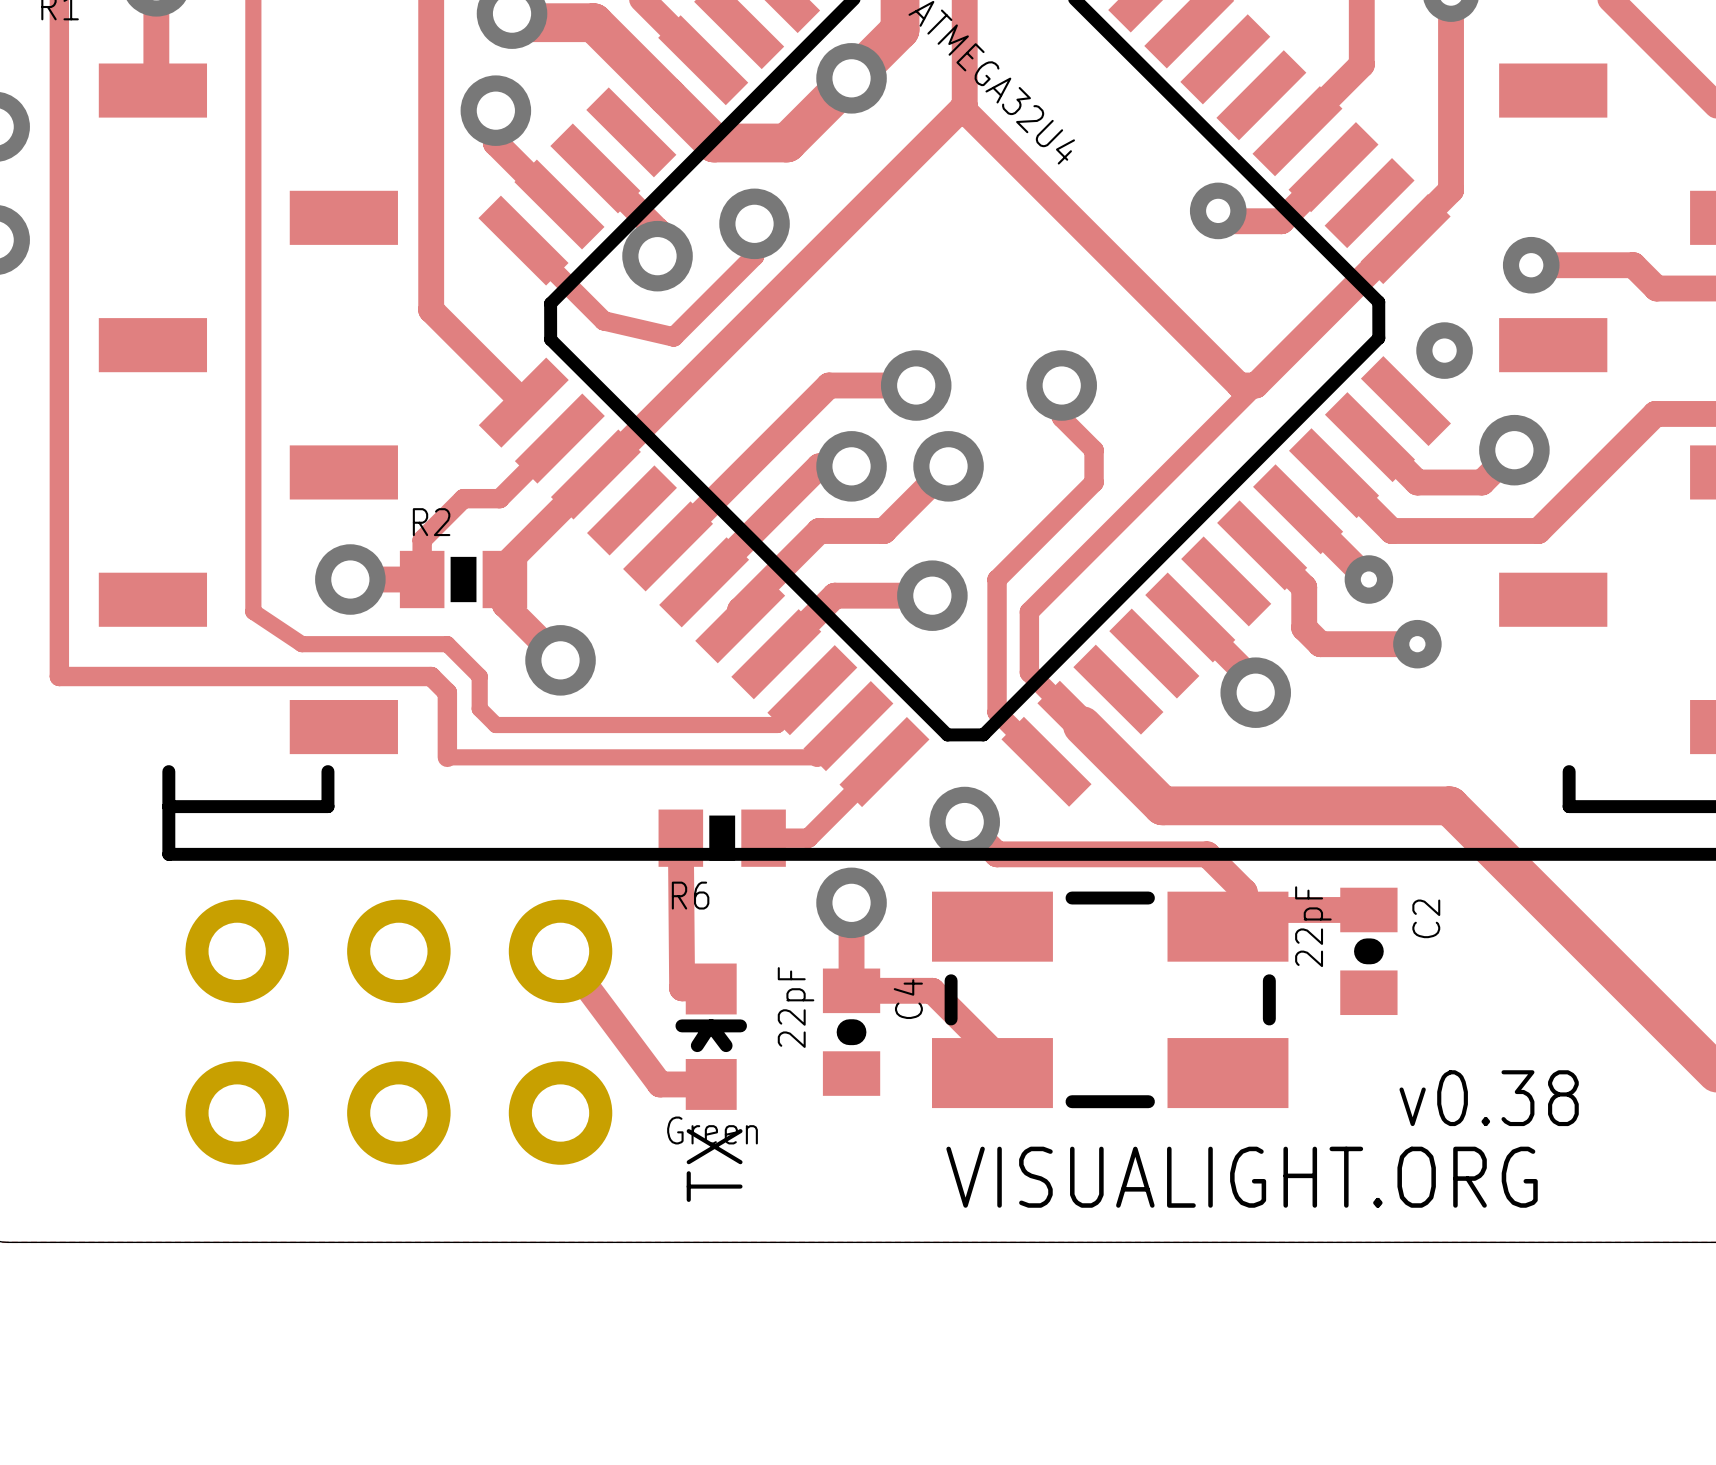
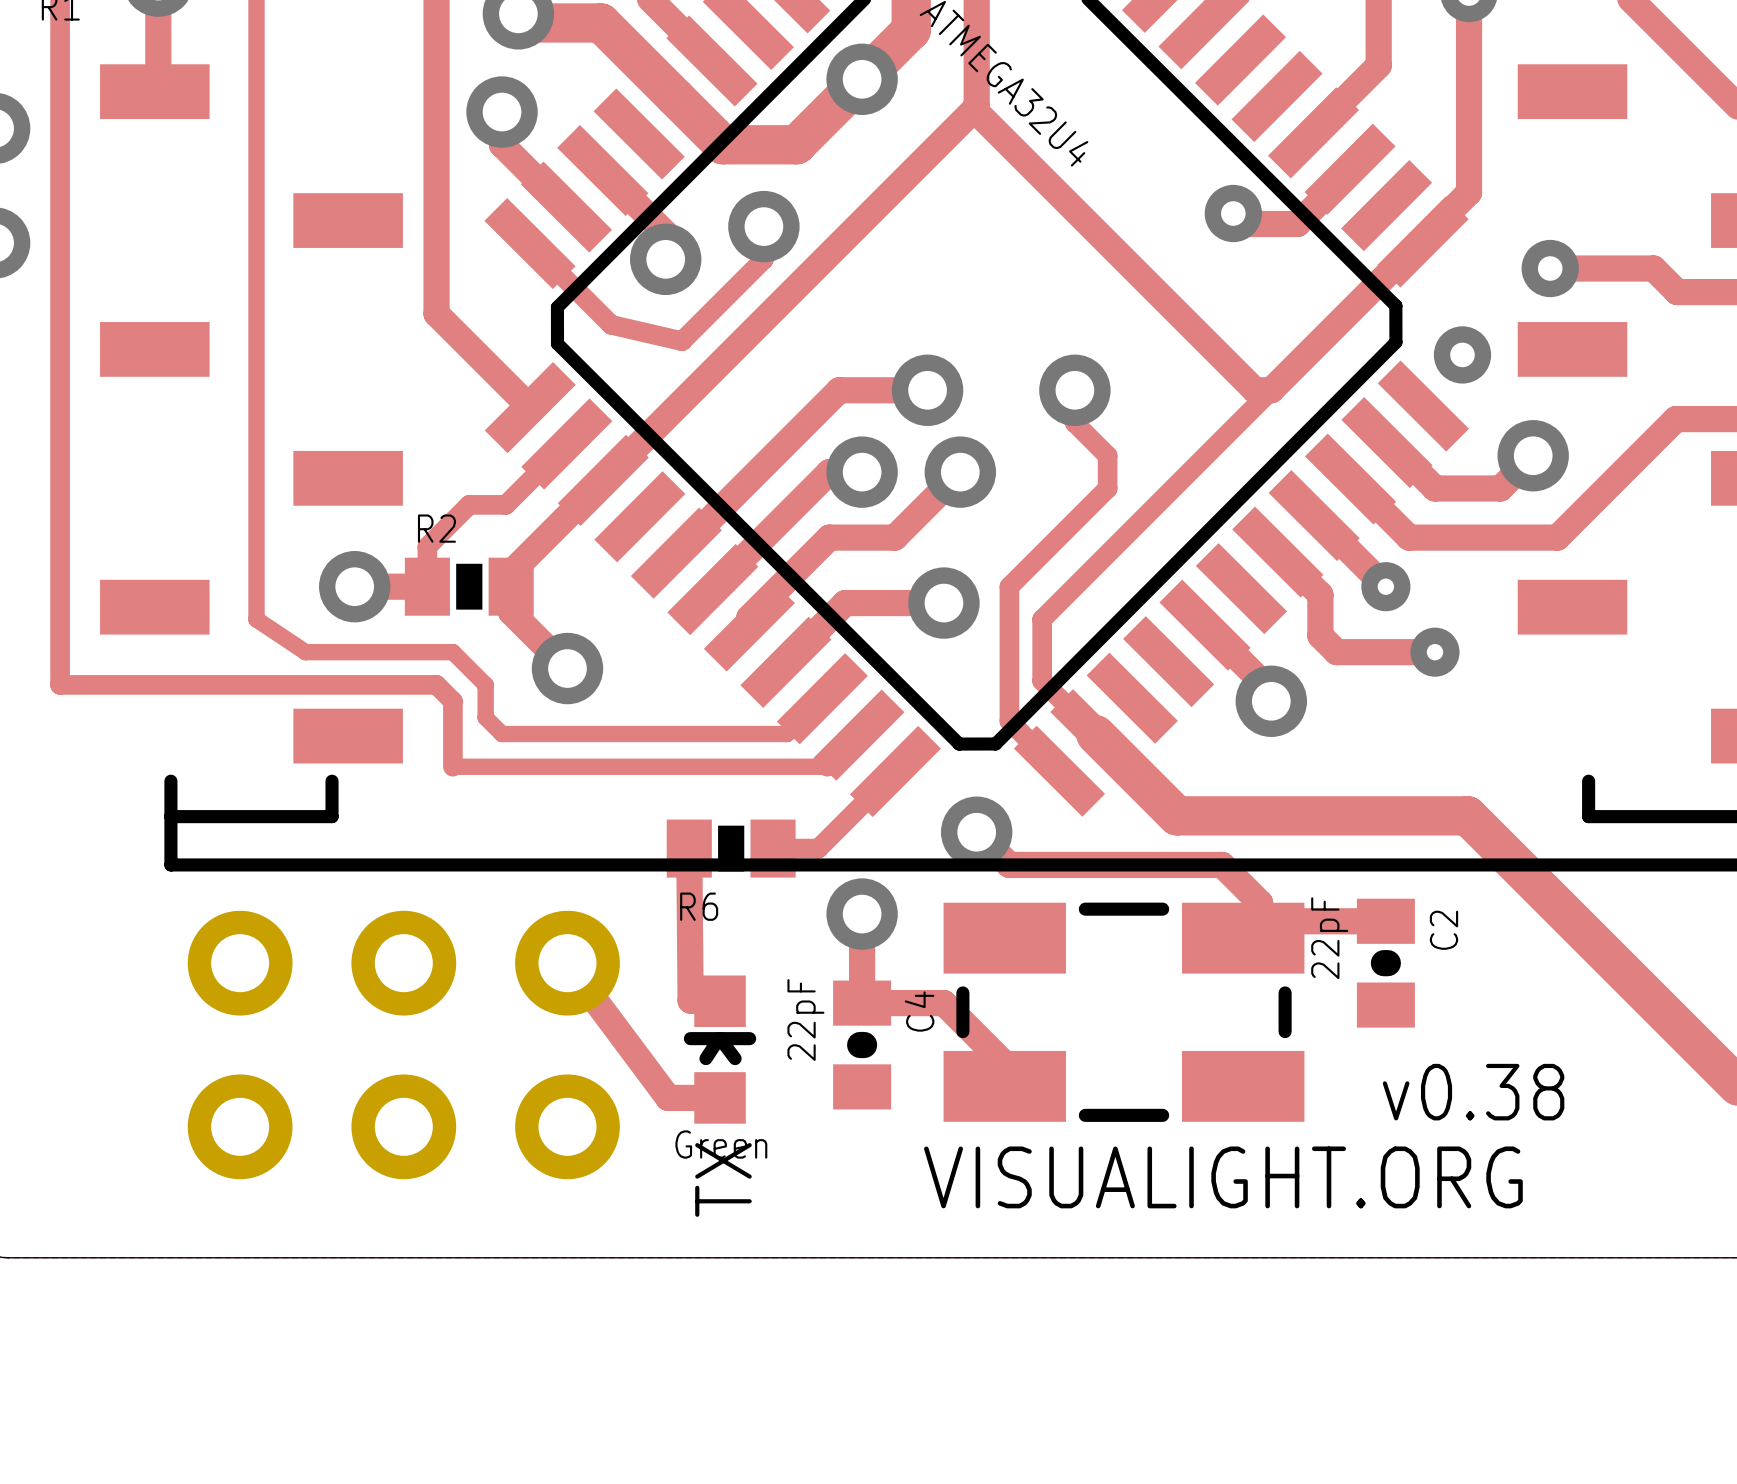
text position: v0.38 (1489, 1098) -> v0.38 (1473, 1092)
text position: VISUALIGHT.ORG (1242, 1177) -> VISUALIGHT.ORG (1223, 1177)

